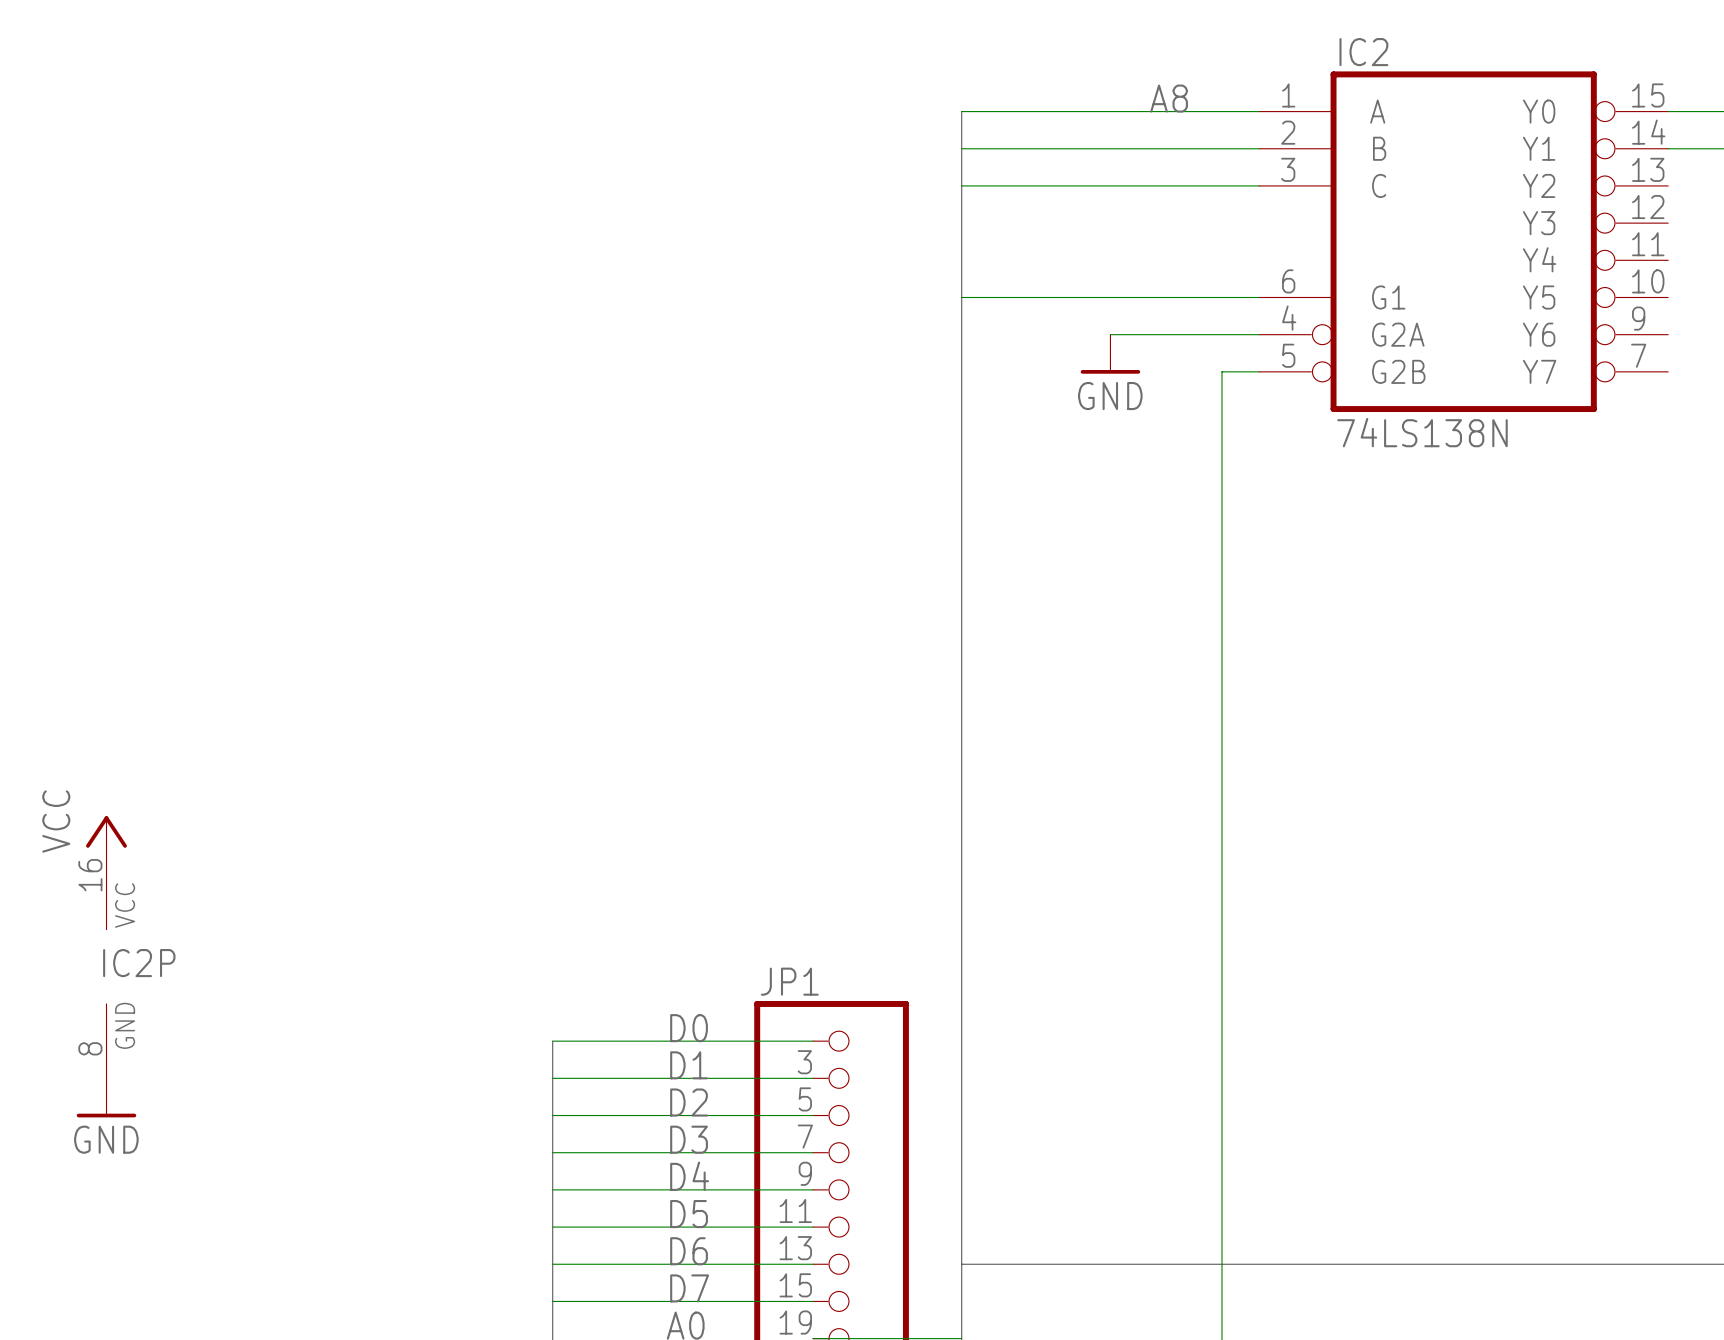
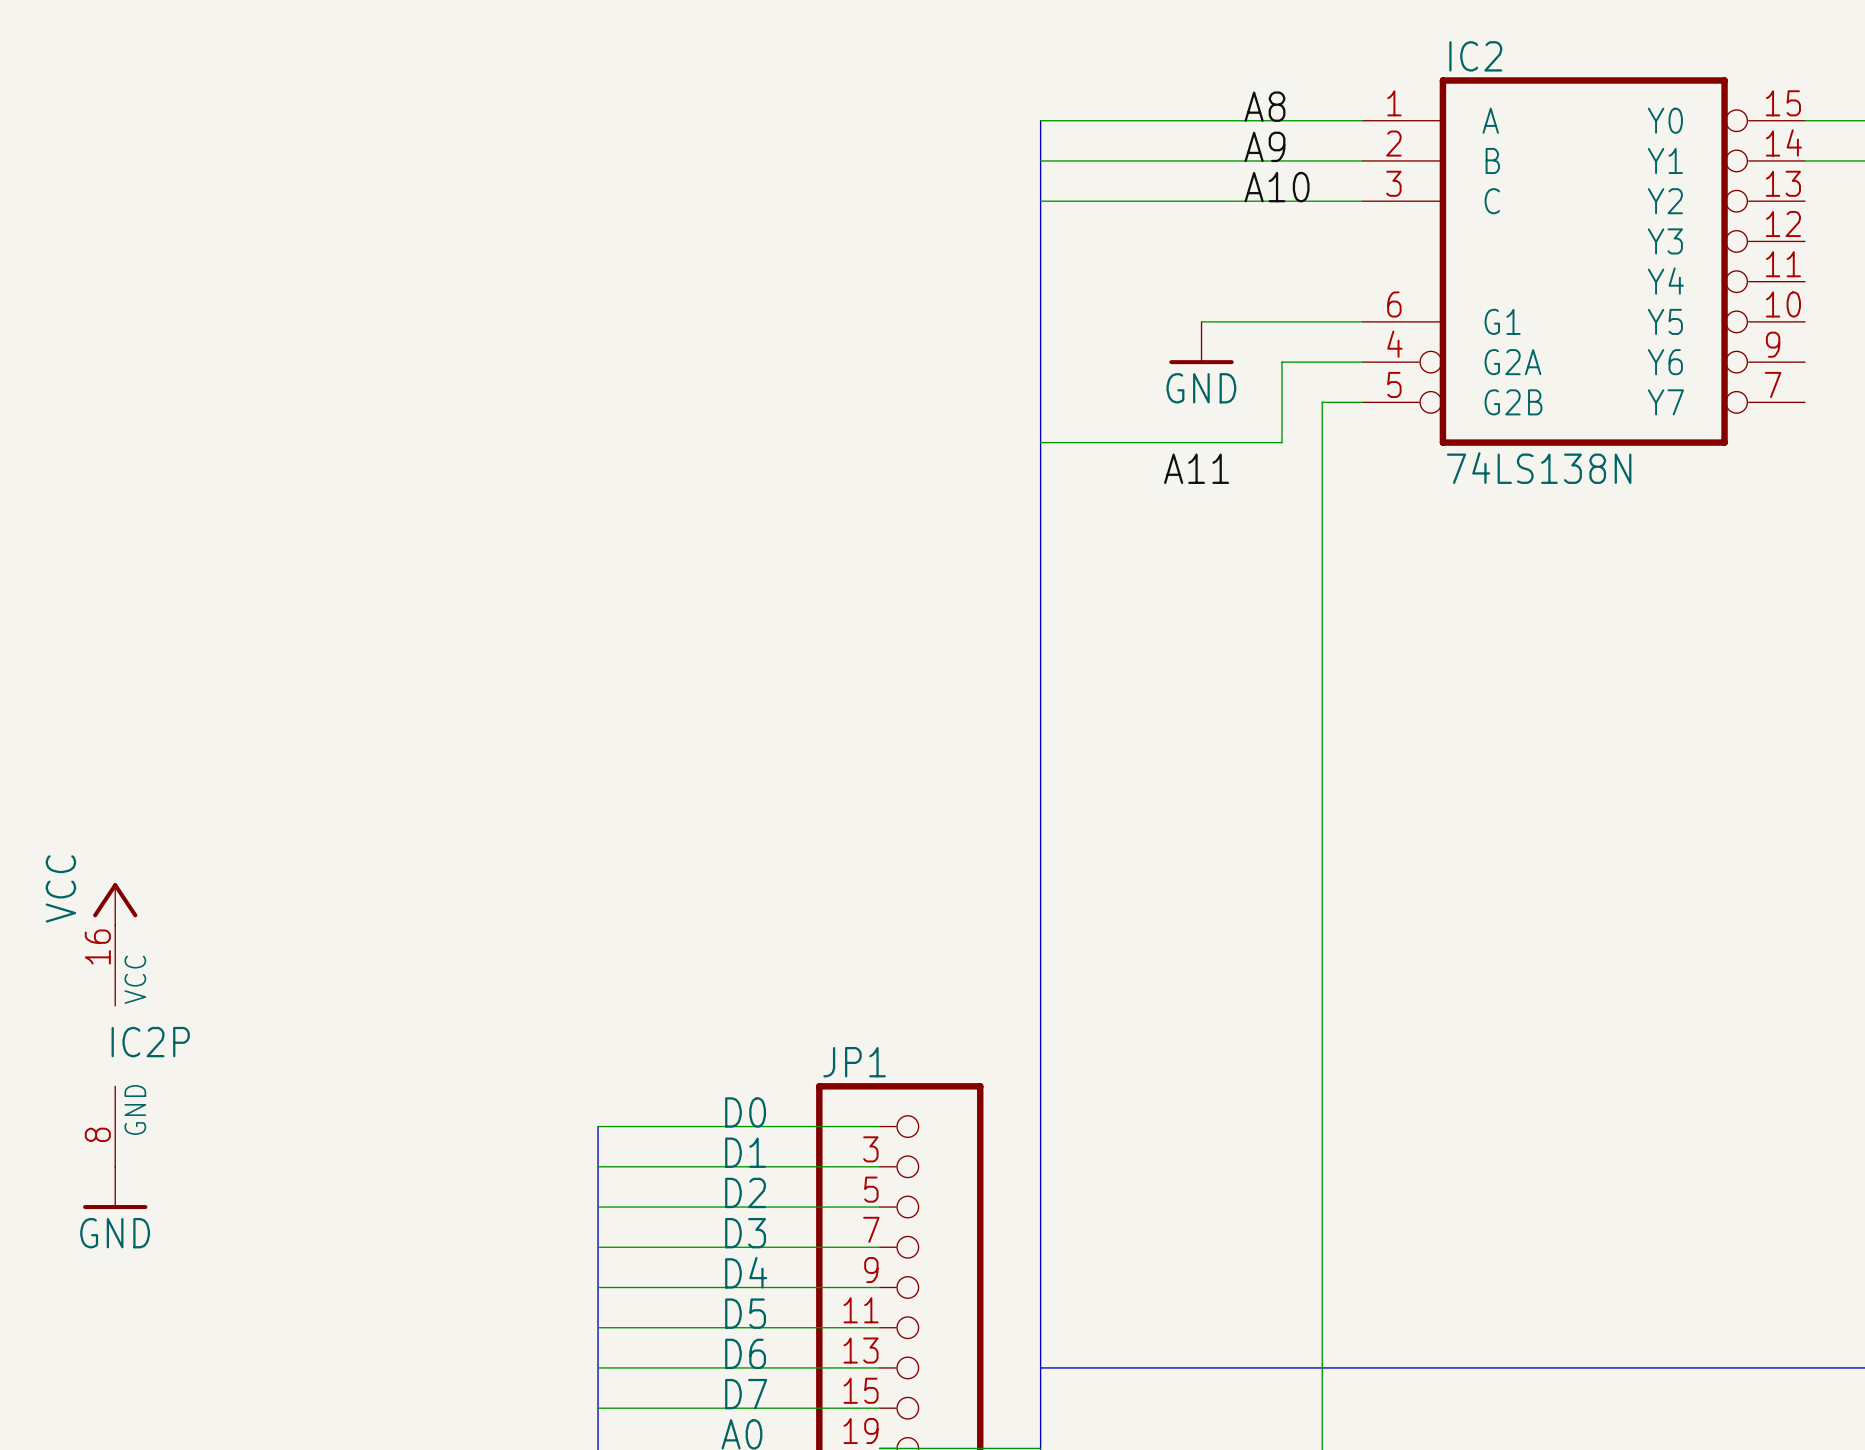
label: none -> A9 (1264, 146)
label: none -> A10 (1277, 187)
wire: (961, 297) (1110, 297) -> none
wire: (1110, 334) (1184, 334) -> (1040, 442) (1281, 442) (1281, 362)
power symbol position: GND (1110, 354) -> GND (1201, 343)
label: none -> A11 (1196, 468)

